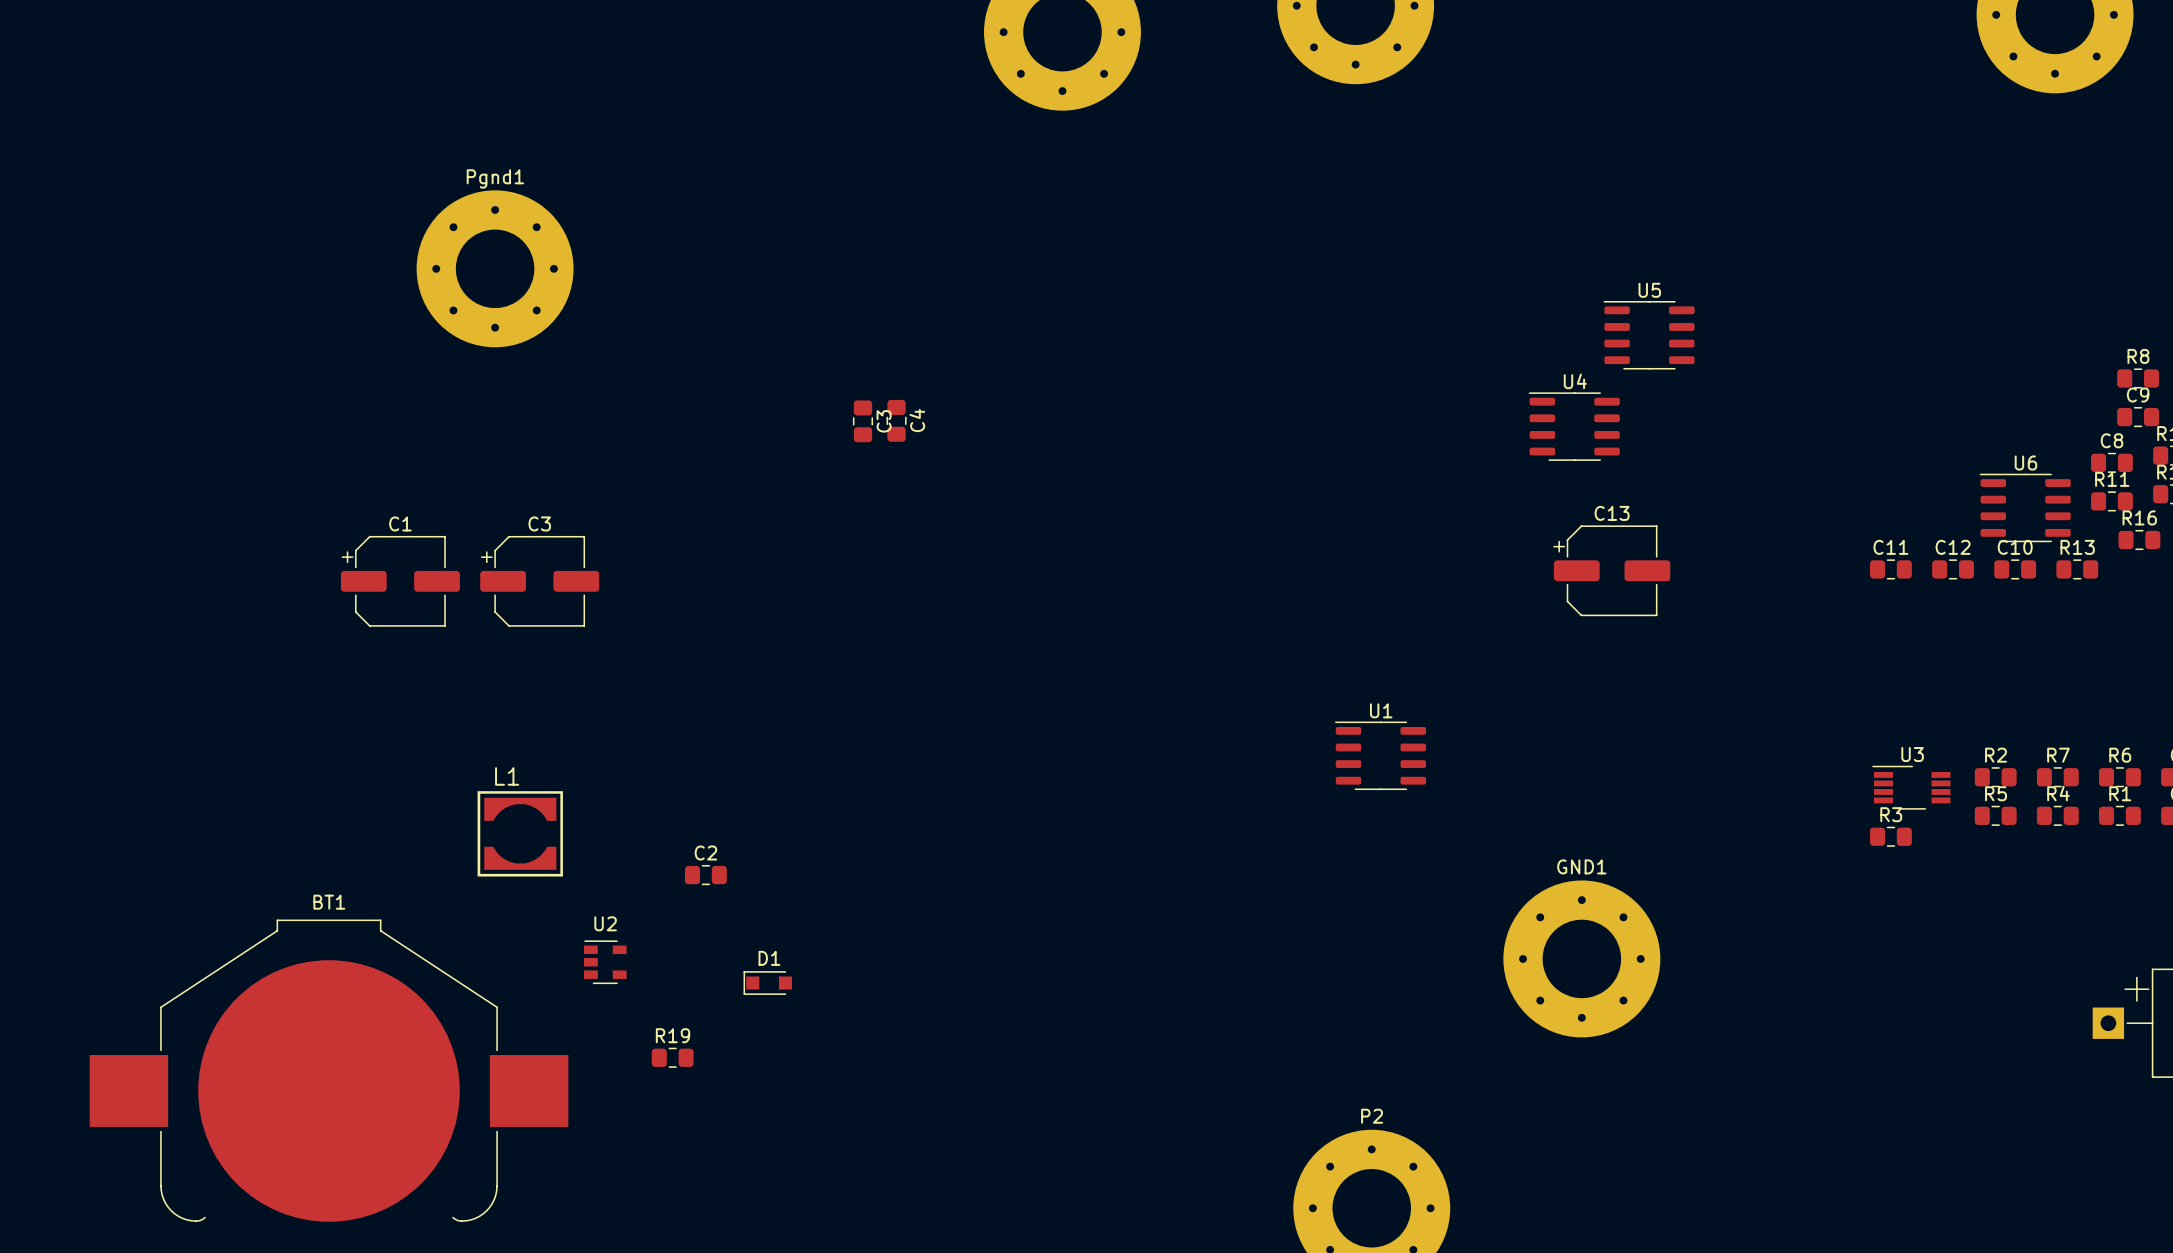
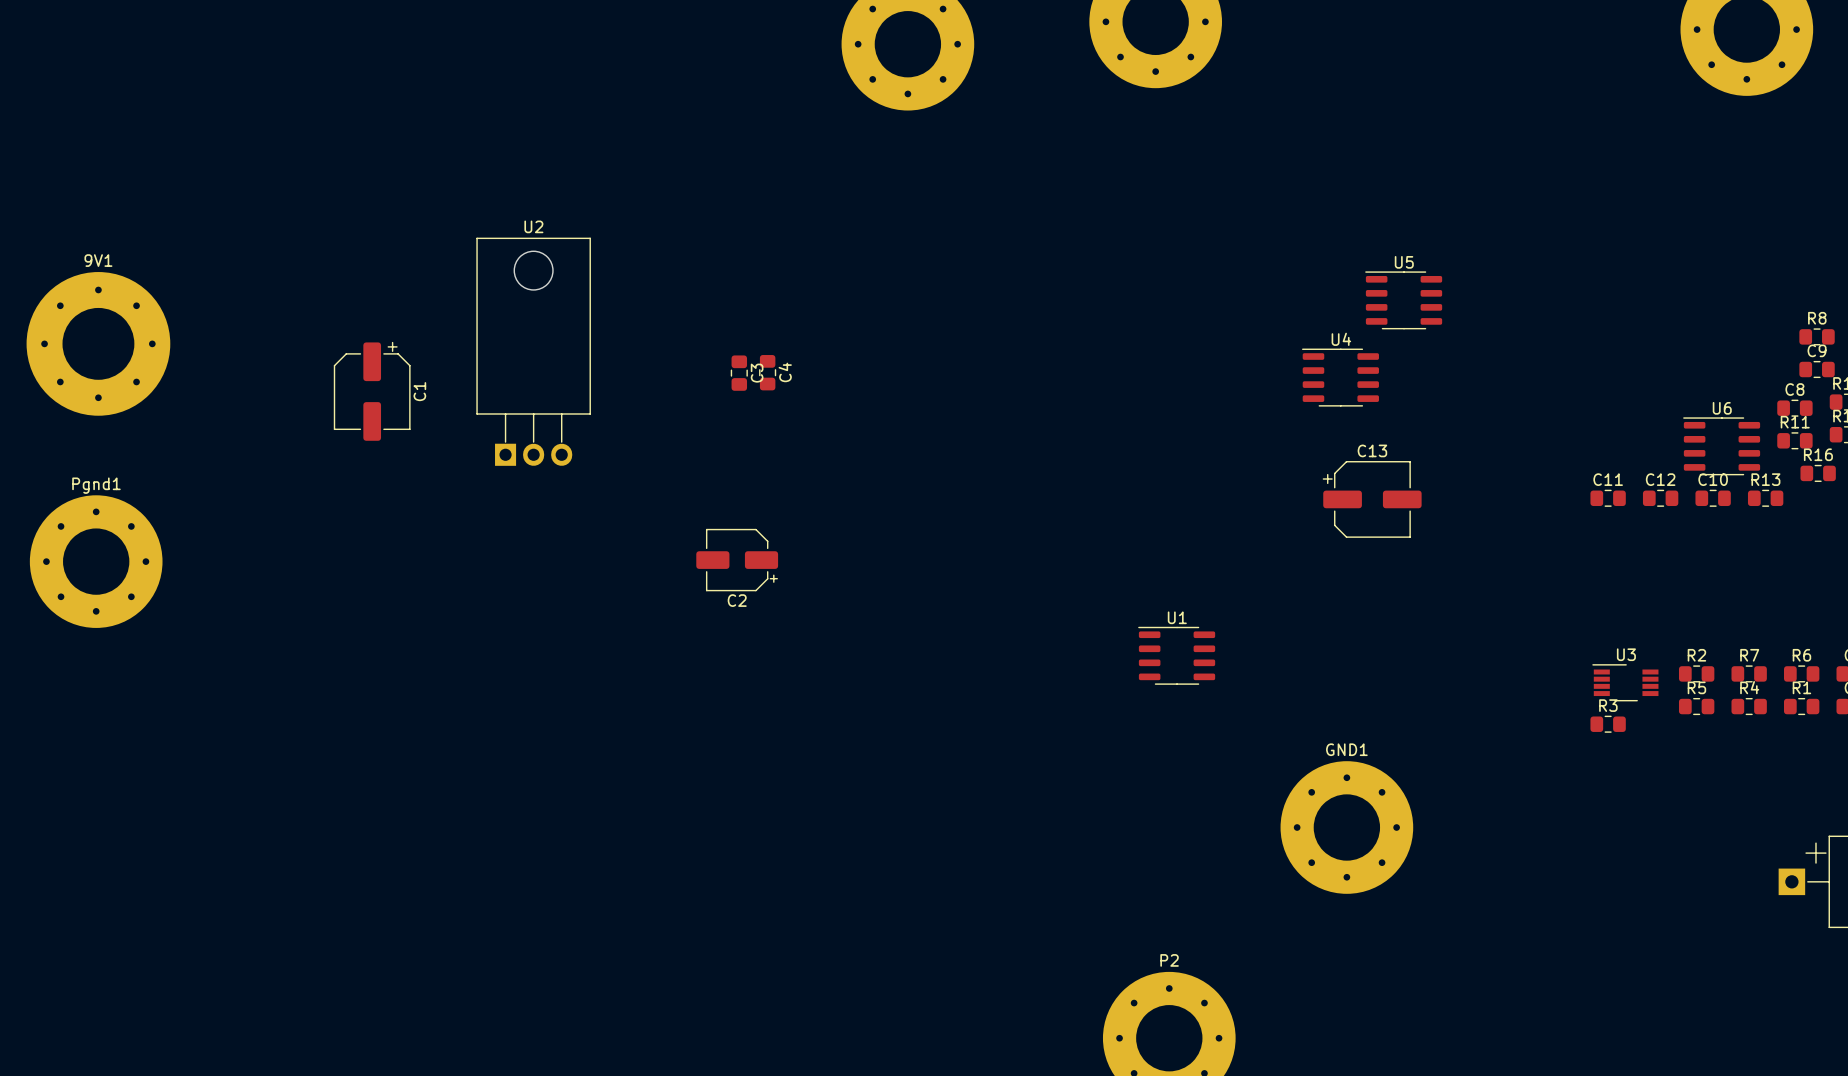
Pgnd1 position: (495, 268) -> (96, 561)
9V1: none -> (98, 343)
C1 name position: C1 (400, 523) -> C1 (419, 391)
C1 footprint: [340, 535, 460, 627] -> [333, 341, 411, 441]
C3: (539, 581) -> none
L1: (520, 833) -> none
C2 name position: C2 (705, 853) -> C2 (737, 600)
C2 footprint: [684, 865, 727, 886] -> [696, 528, 779, 592]
U2 name position: U2 (605, 923) -> U2 (533, 226)
U2 footprint: [583, 940, 627, 985] -> [476, 237, 591, 466]
D1: (767, 983) -> none
R19: (672, 1057) -> none
BT1: (329, 1070) -> none

